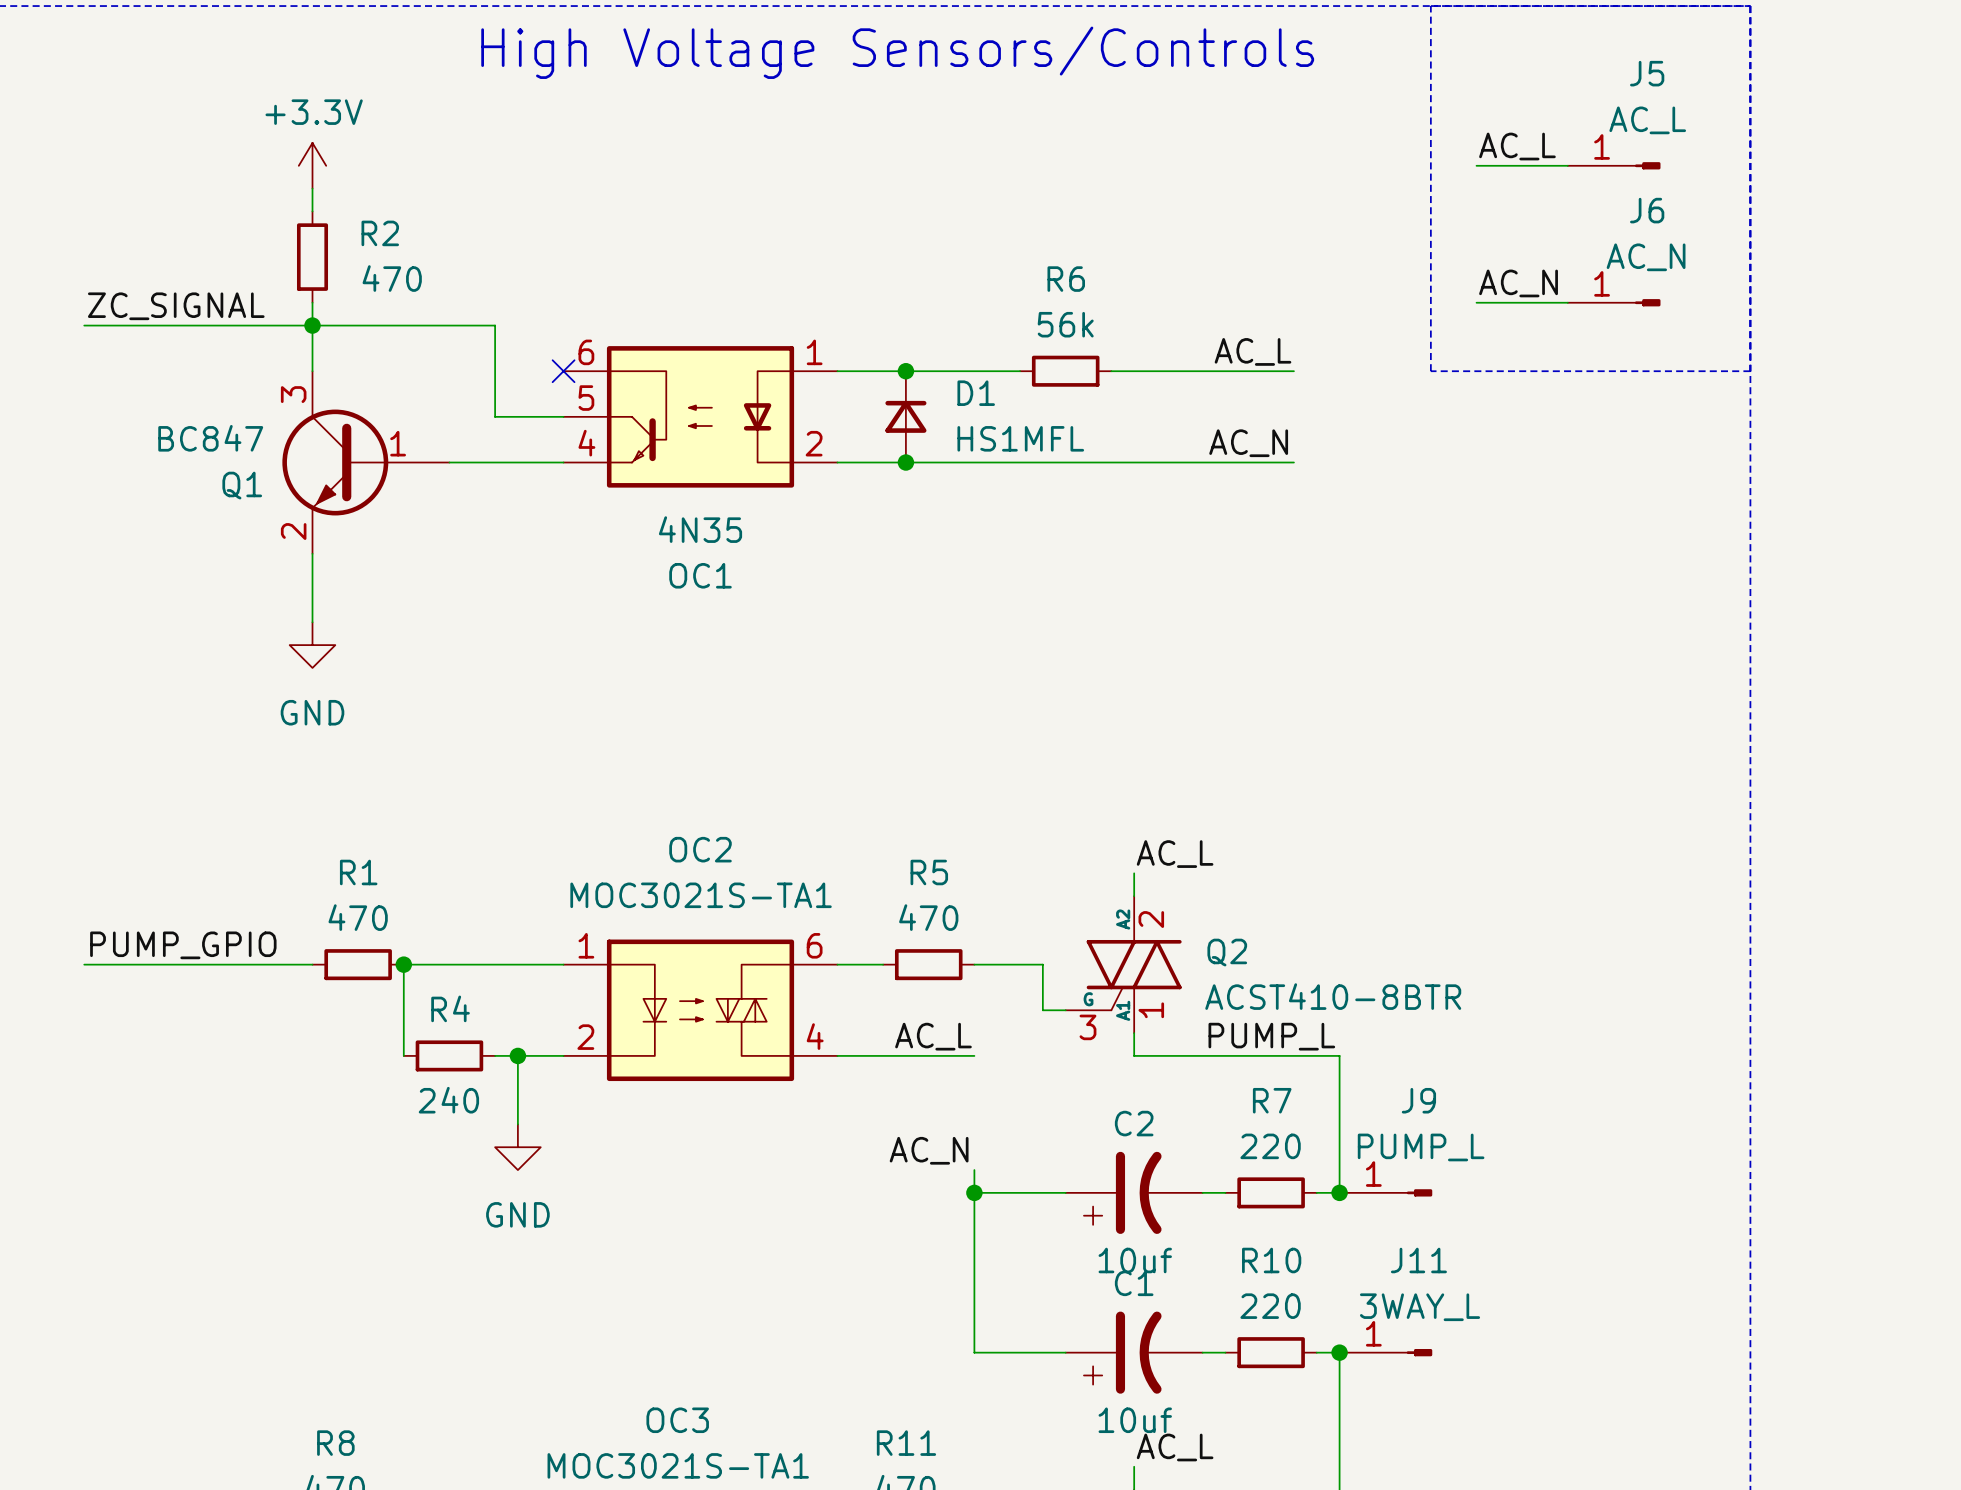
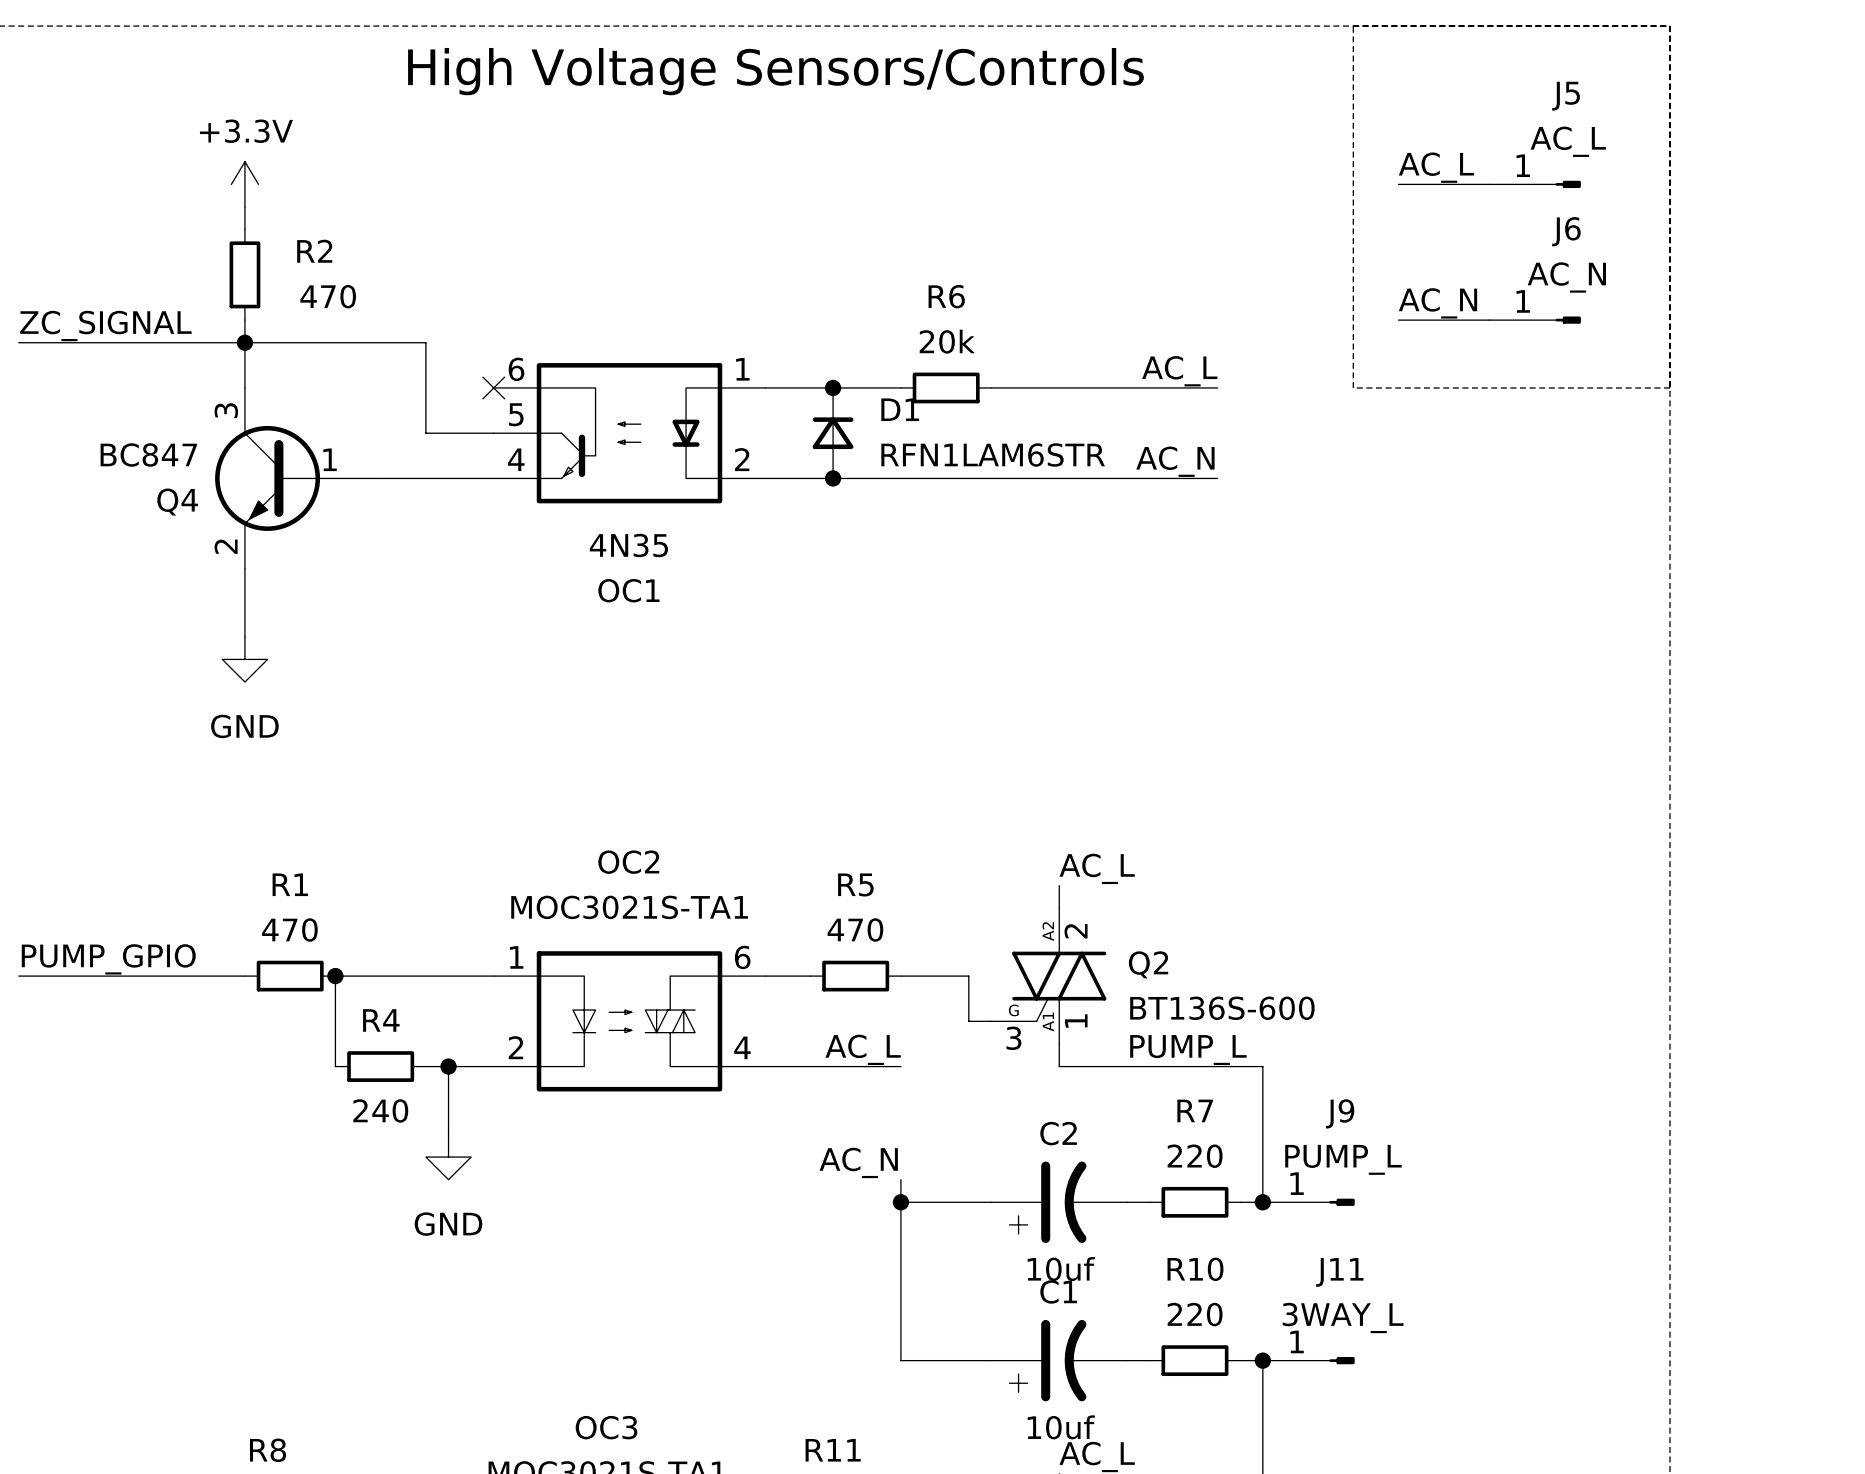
R6 value: 56k (1065, 324) -> 20k (947, 341)
wire: (974, 371) (1020, 371) -> (991, 387) (1036, 387)
R6 position: (1065, 371) -> (946, 387)
D1 value: HS1MFL (1020, 438) -> RFN1LAM6STR (993, 455)
Q1 name: Q1 (242, 485) -> Q4 (177, 502)
Q2 value: ACST410-8BTR (1333, 996) -> BT136S-600 (1222, 1008)

